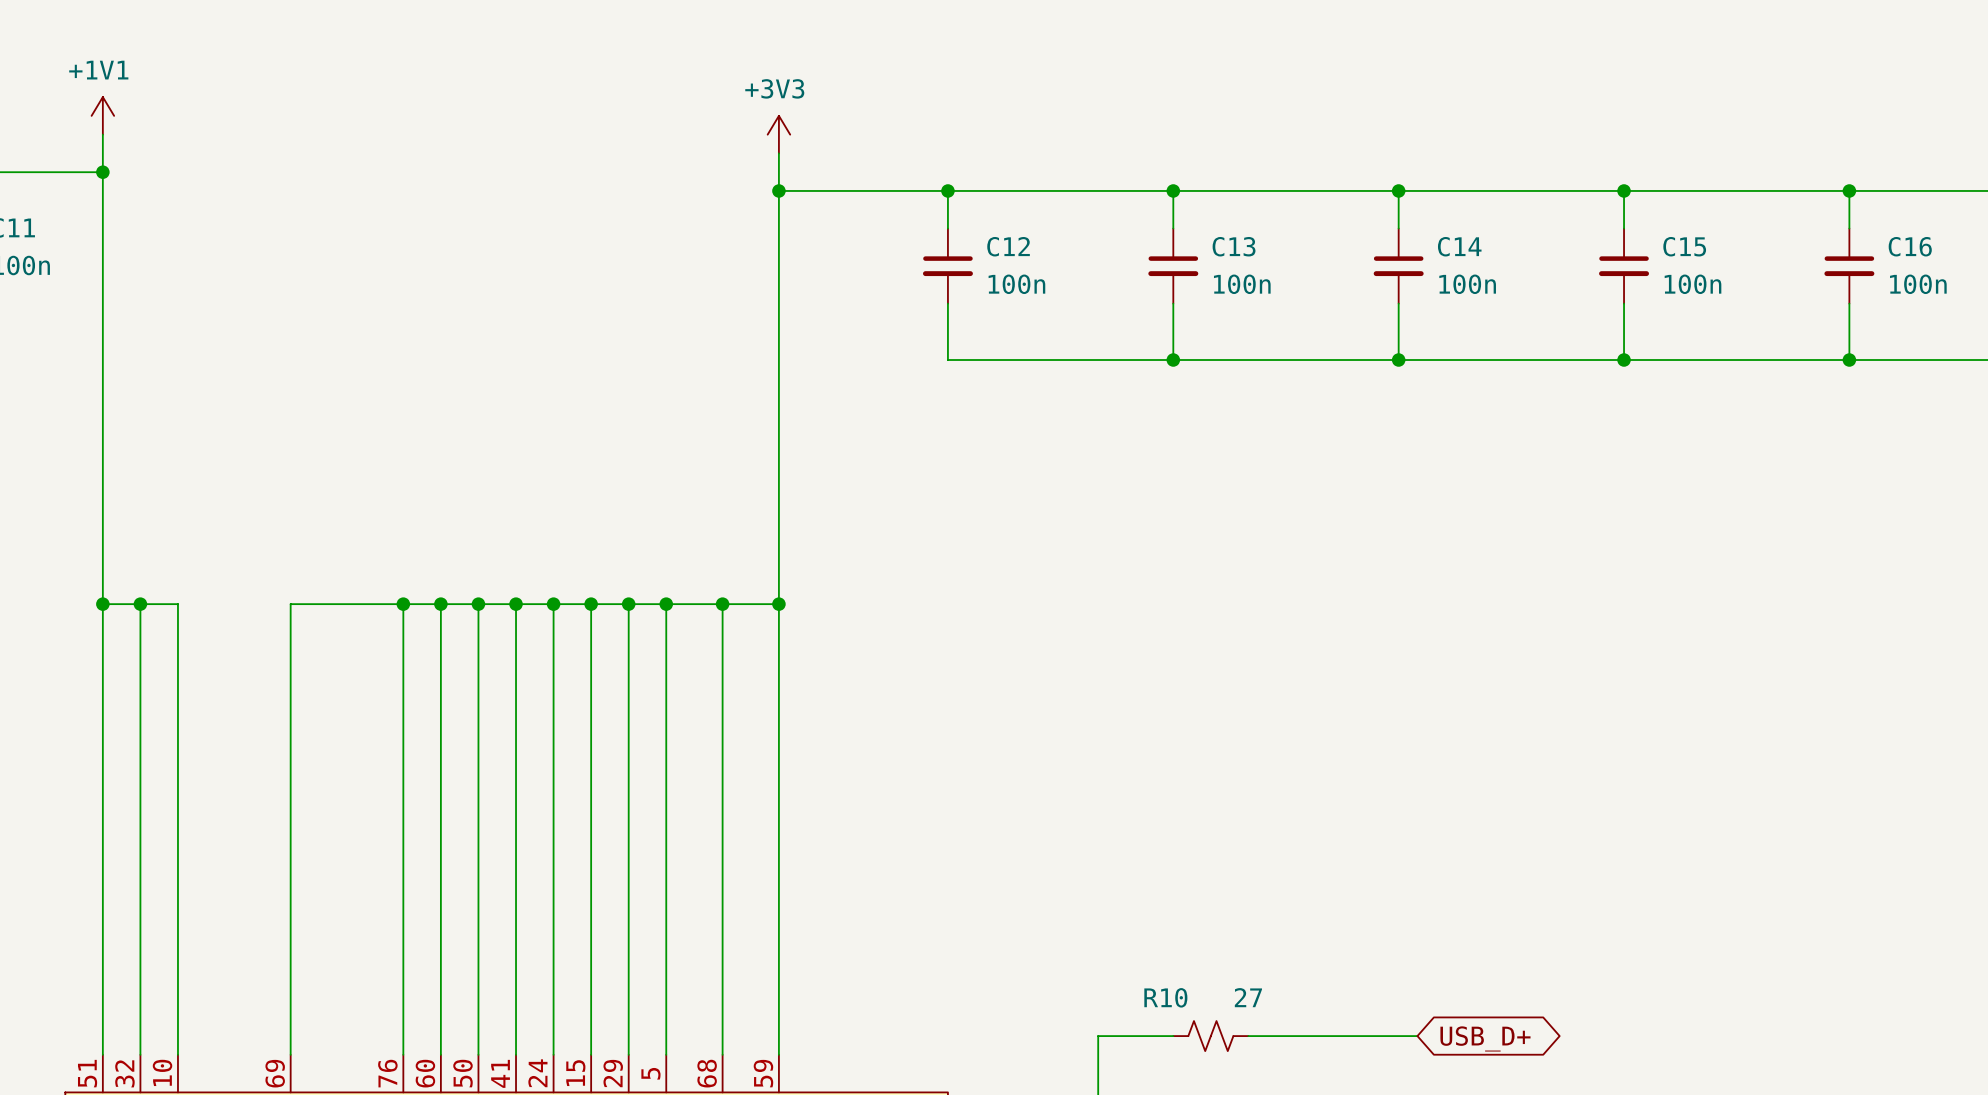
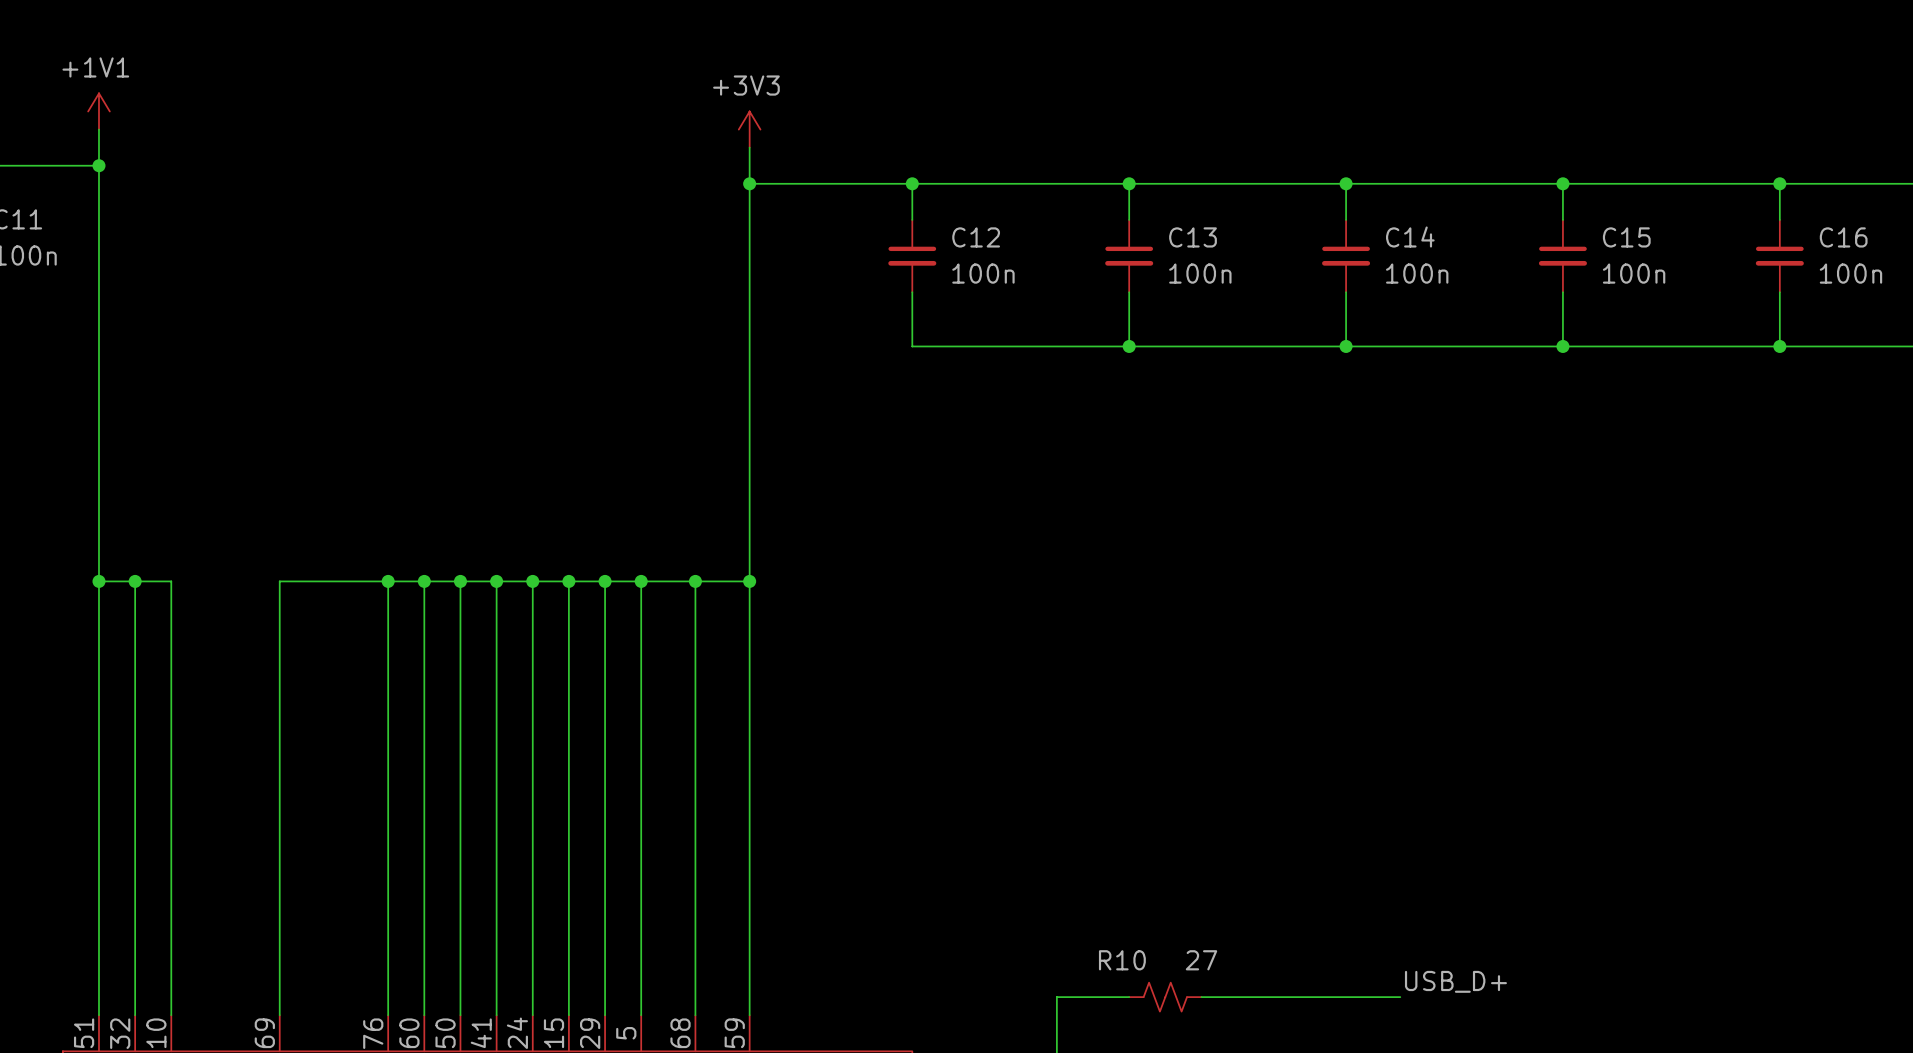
label: none -> USB_D+ (1455, 981)
wire: none -> (1364, 997) (1400, 997)
global label: USB_D+ (1485, 1038) -> none

